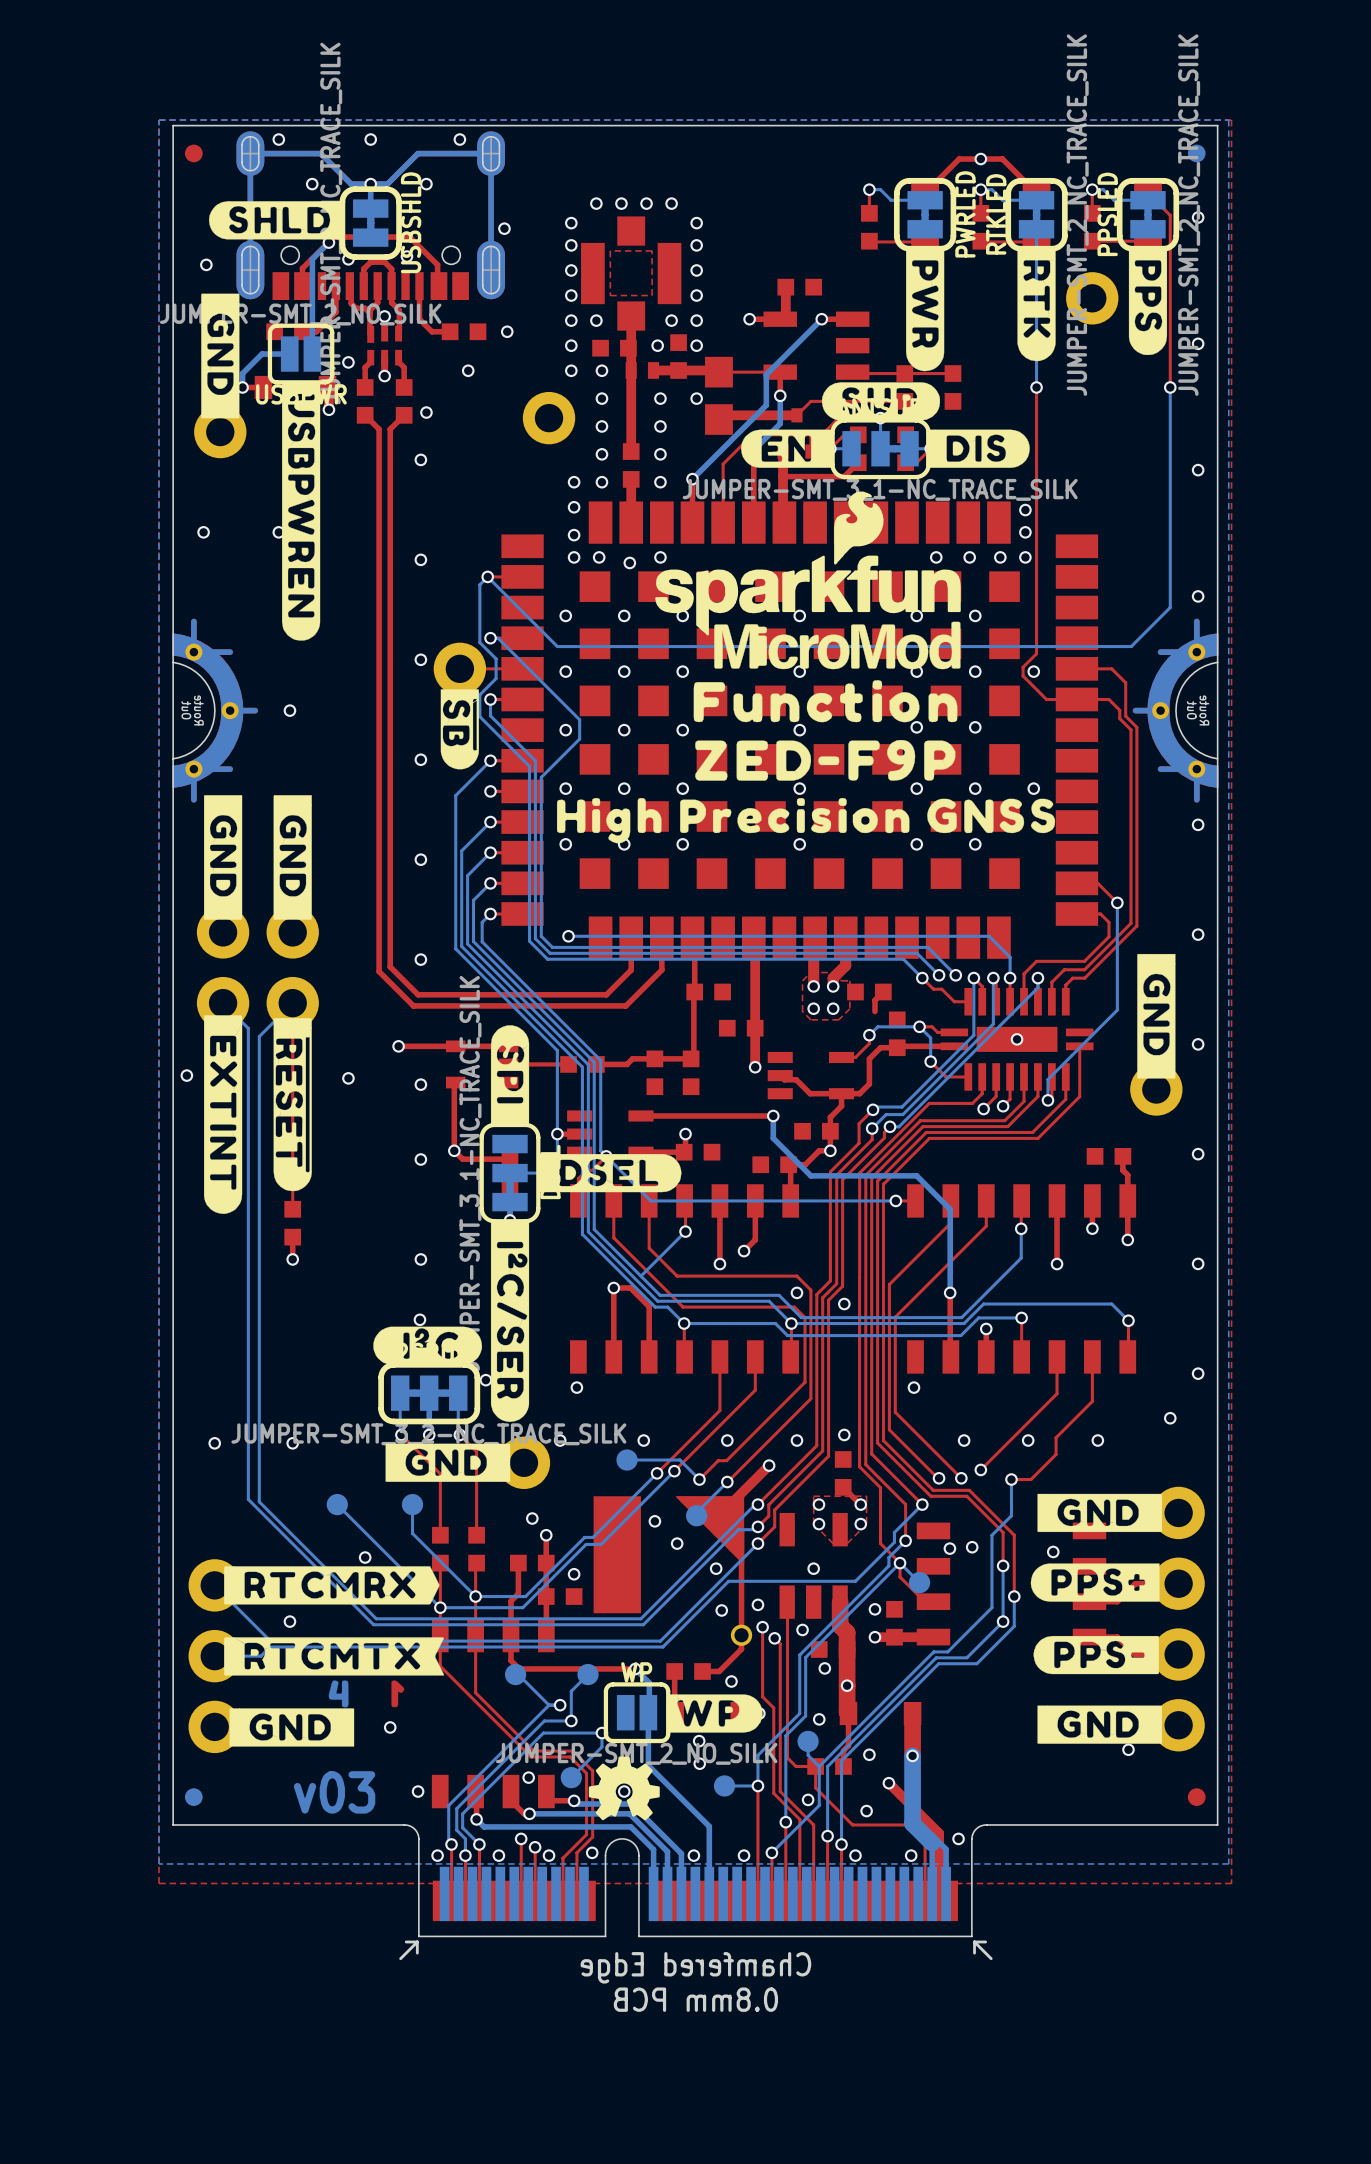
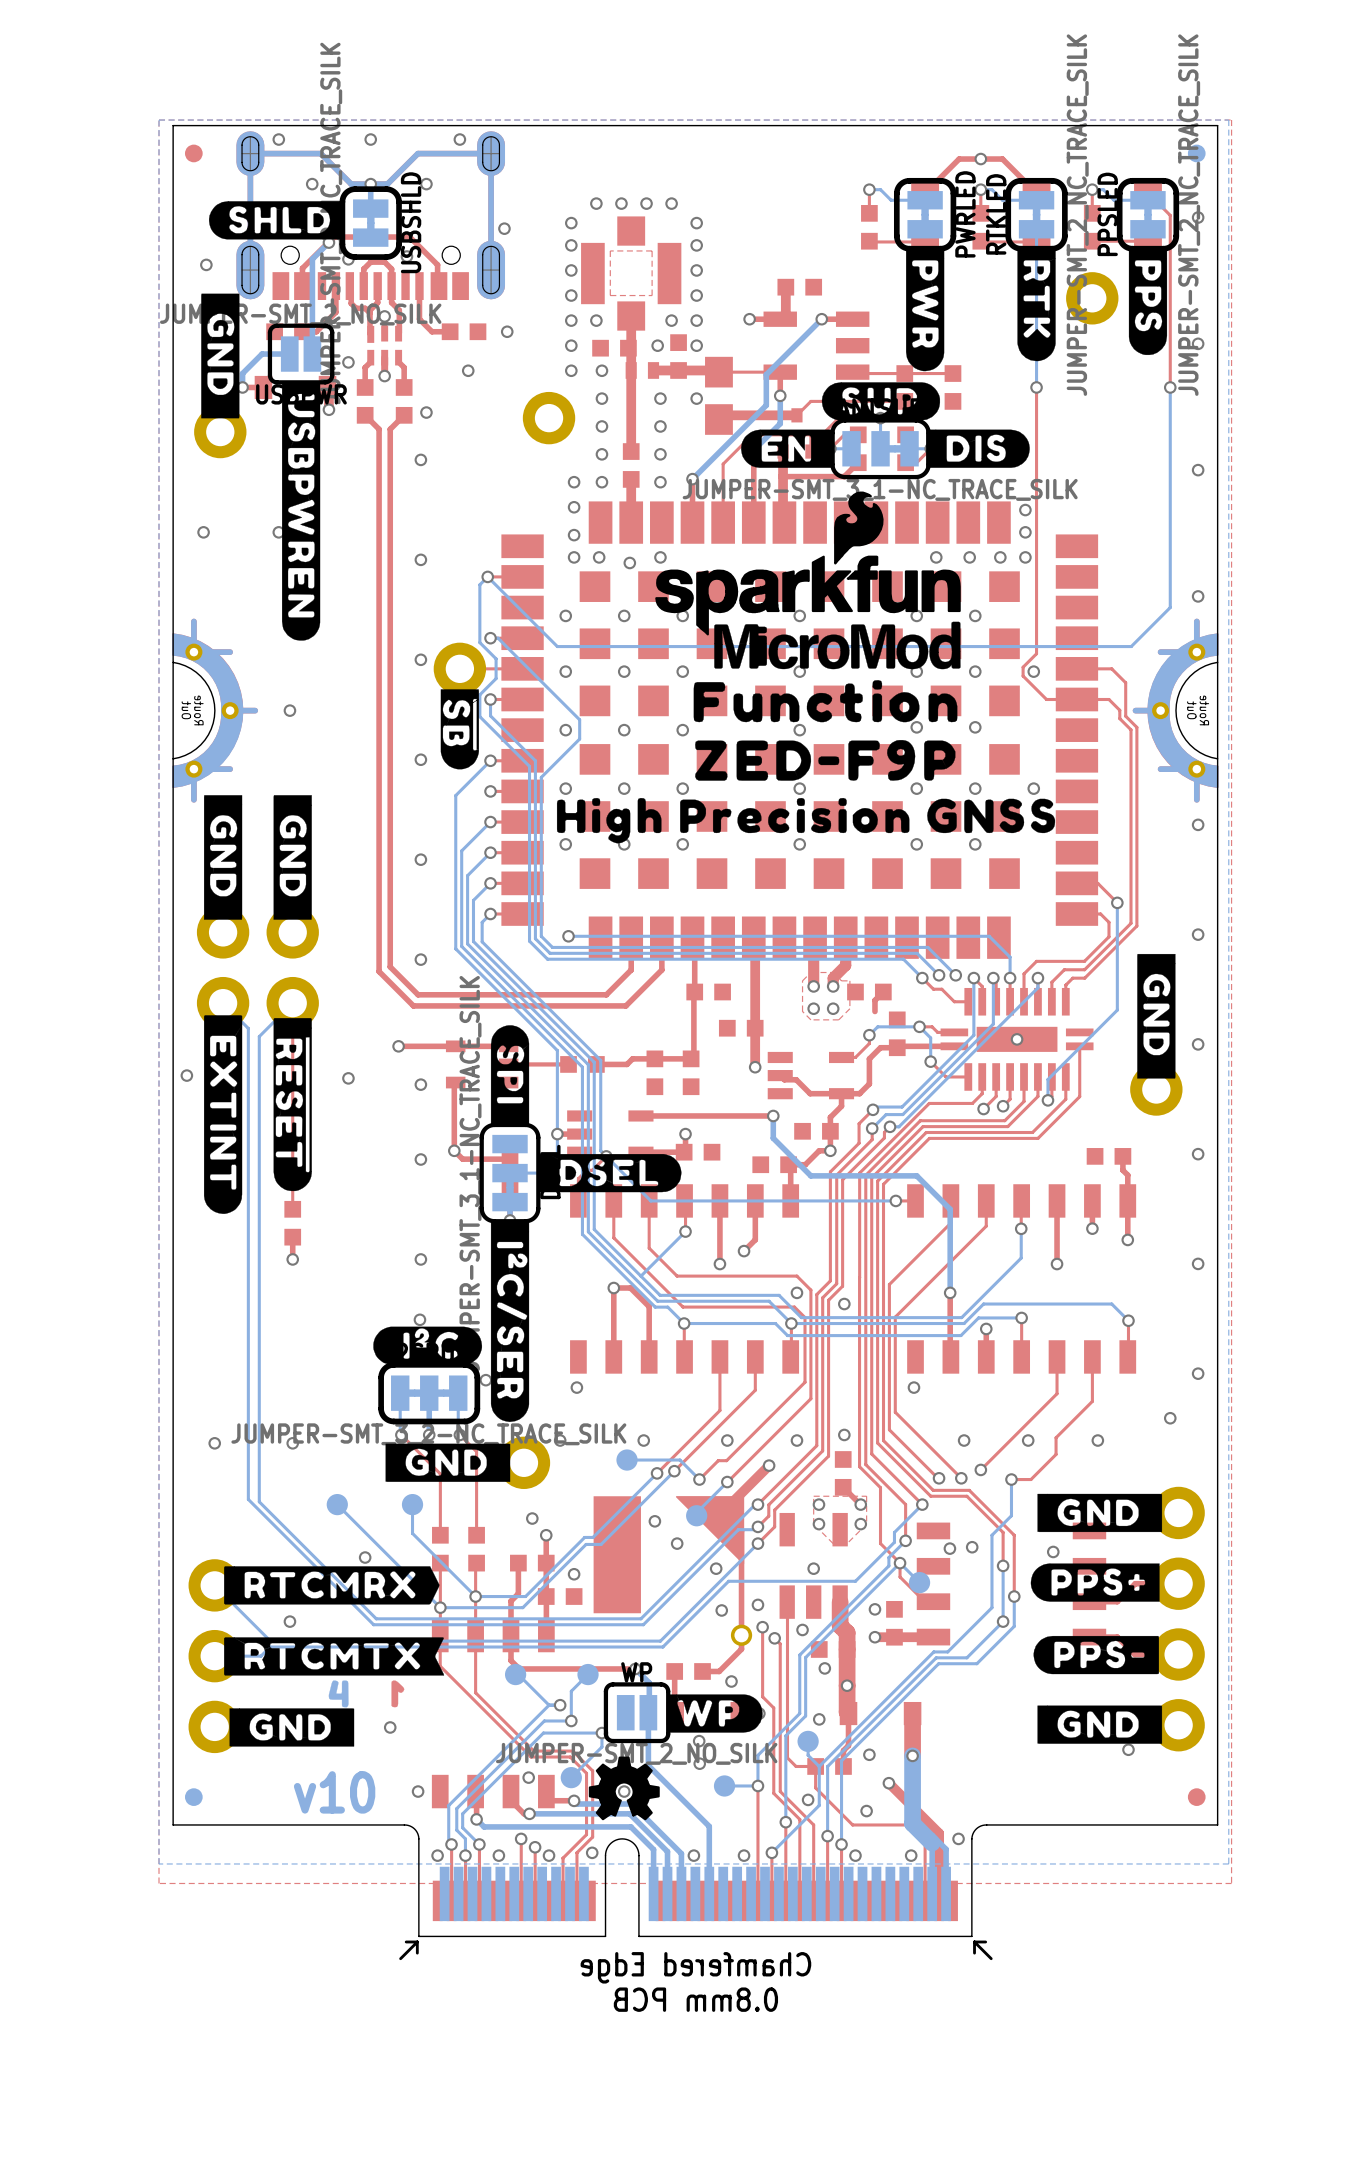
text: v03 (334, 1792) -> v10 (334, 1792)

